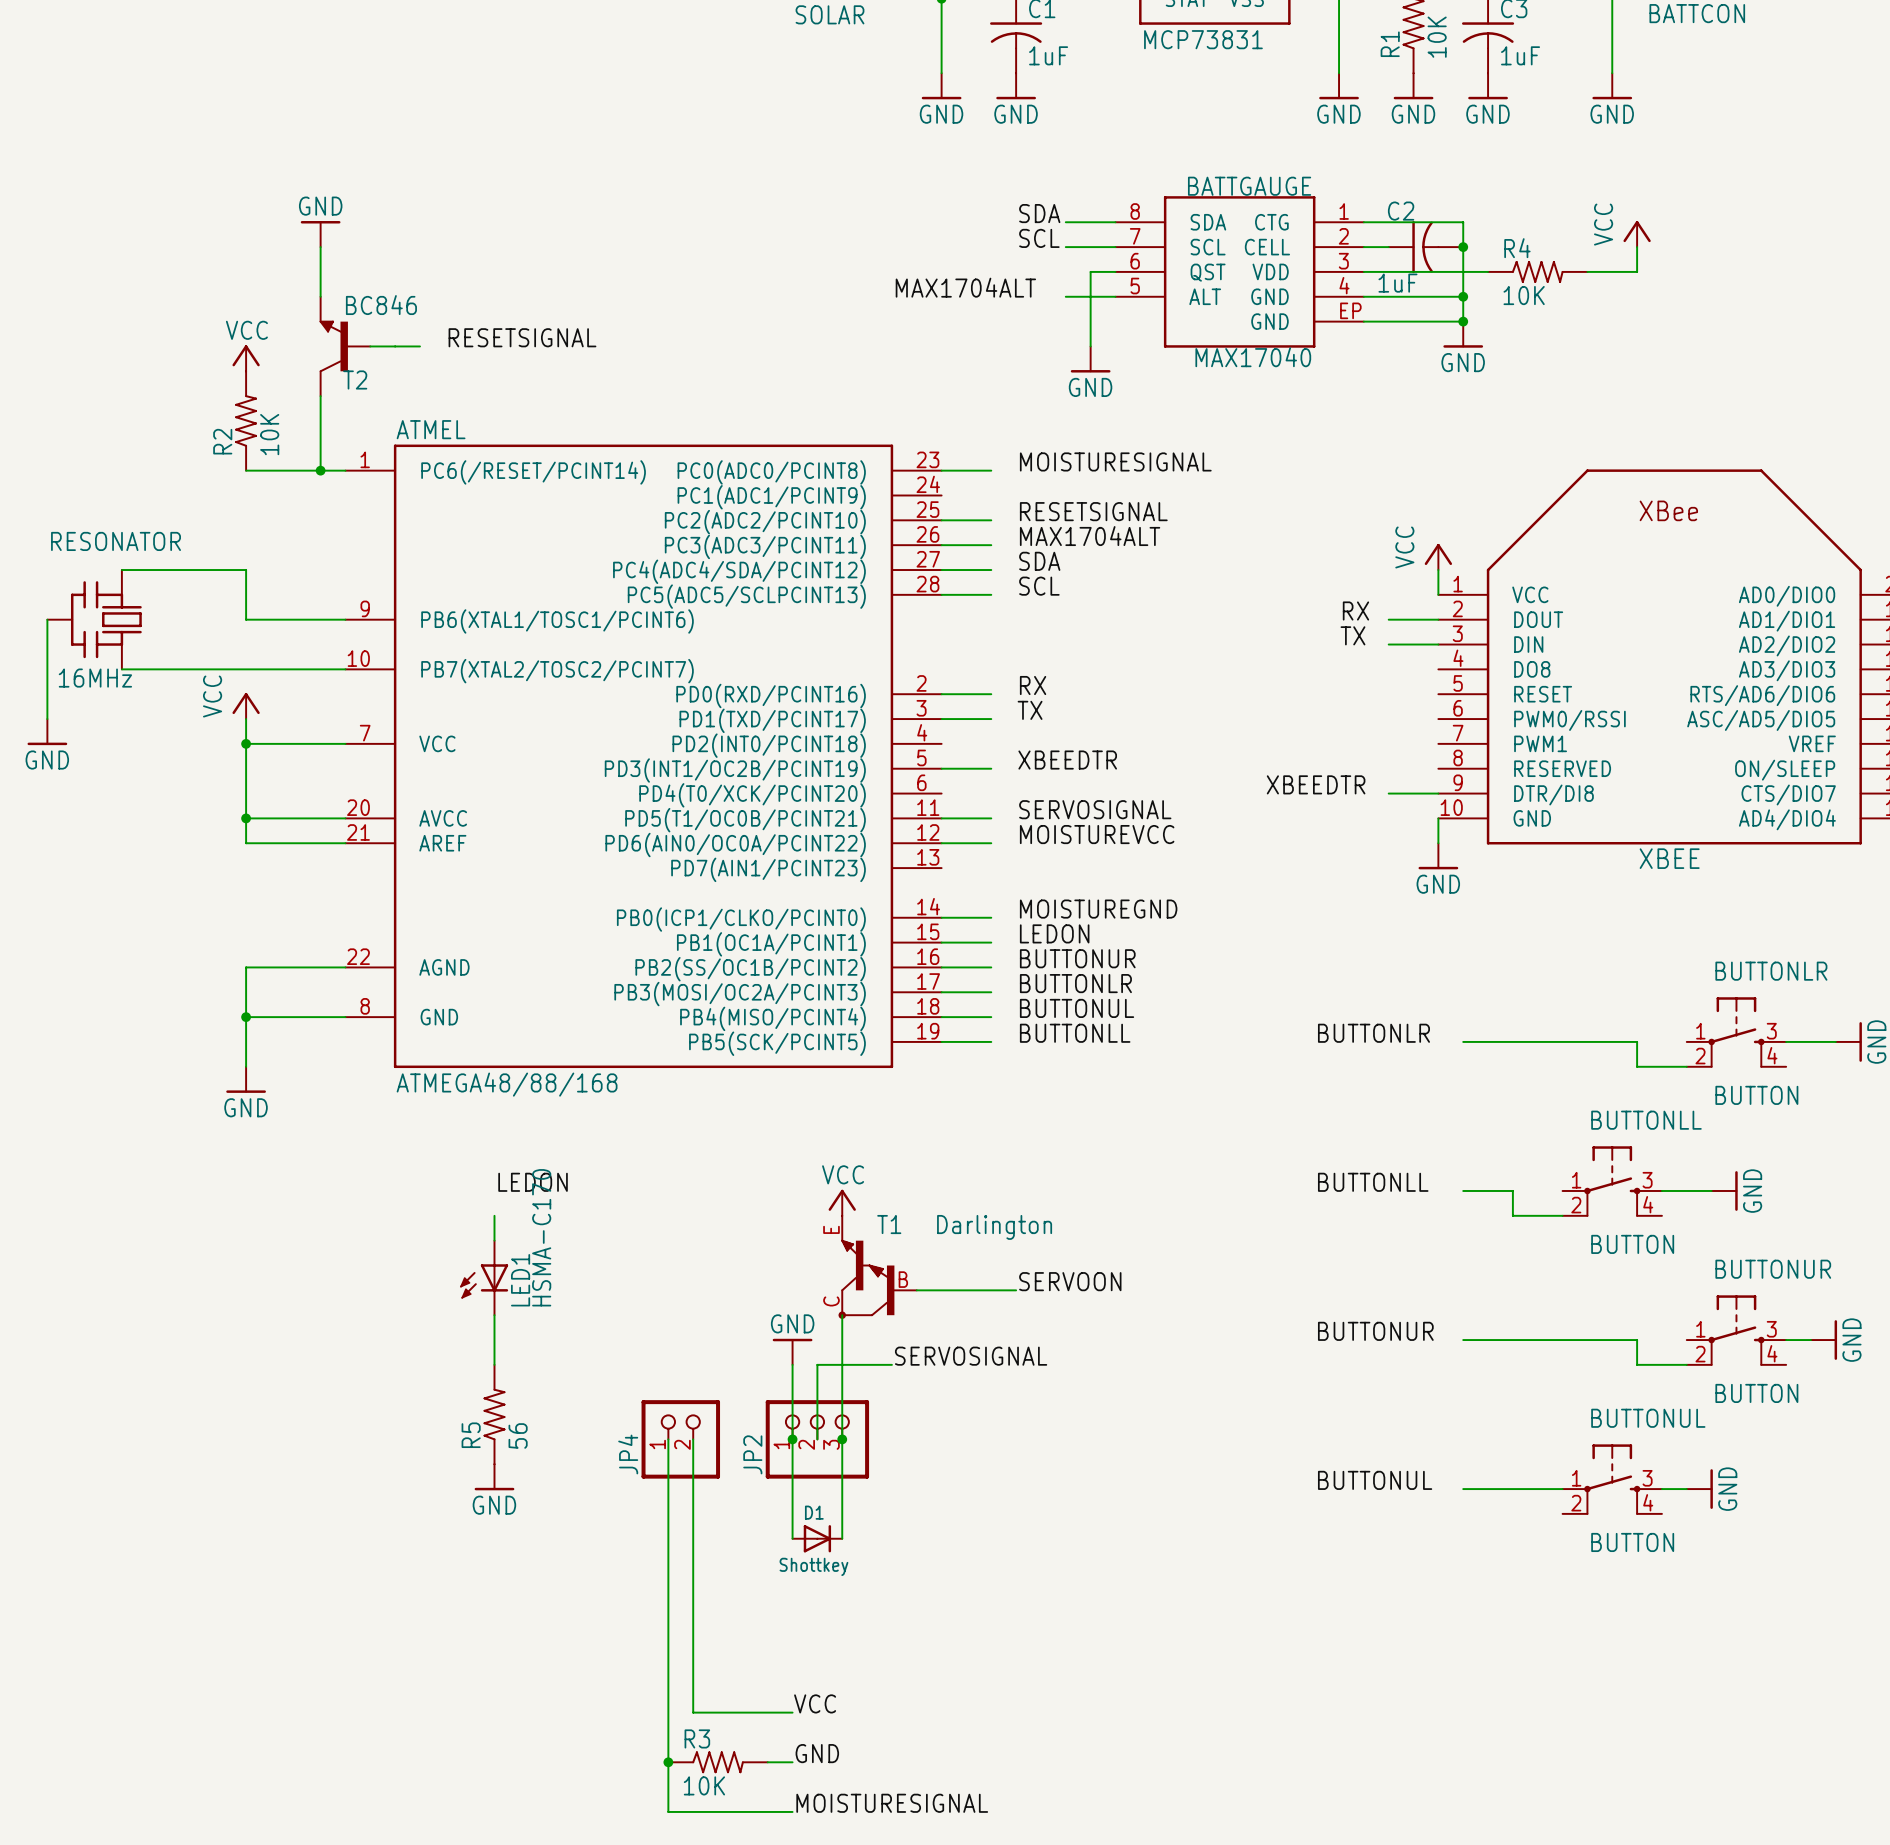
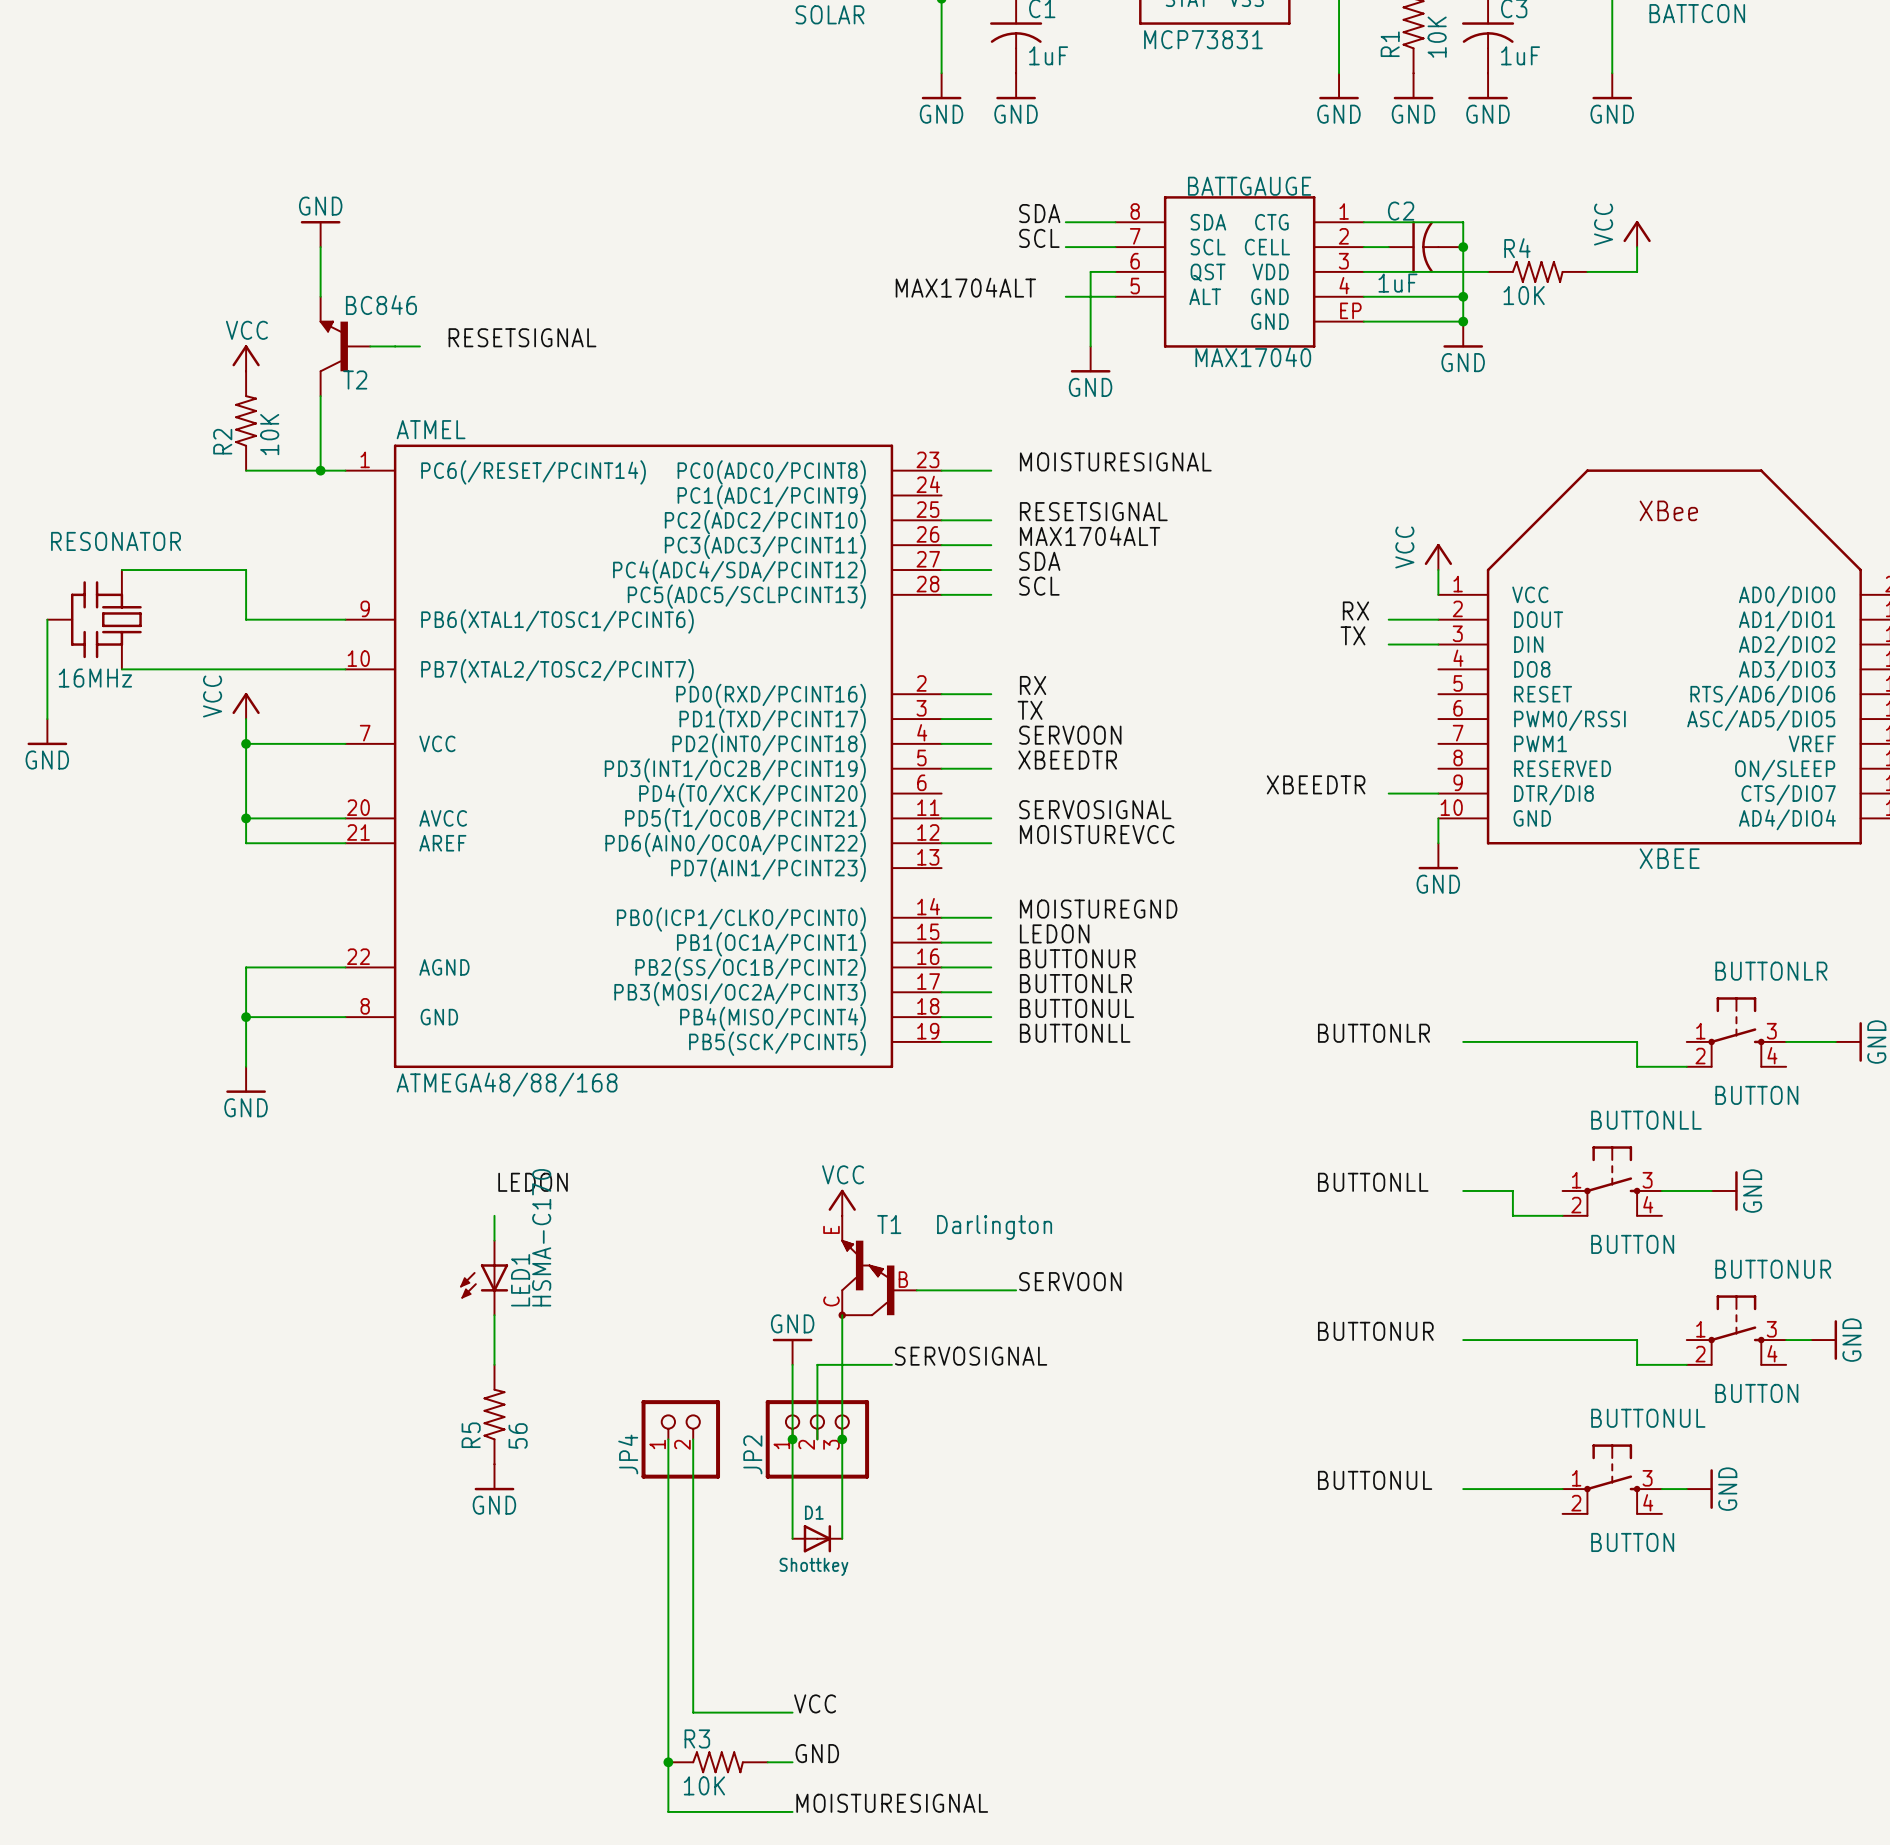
label: none -> SERVOON (1070, 735)
wire: none -> (941, 743) (991, 743)

